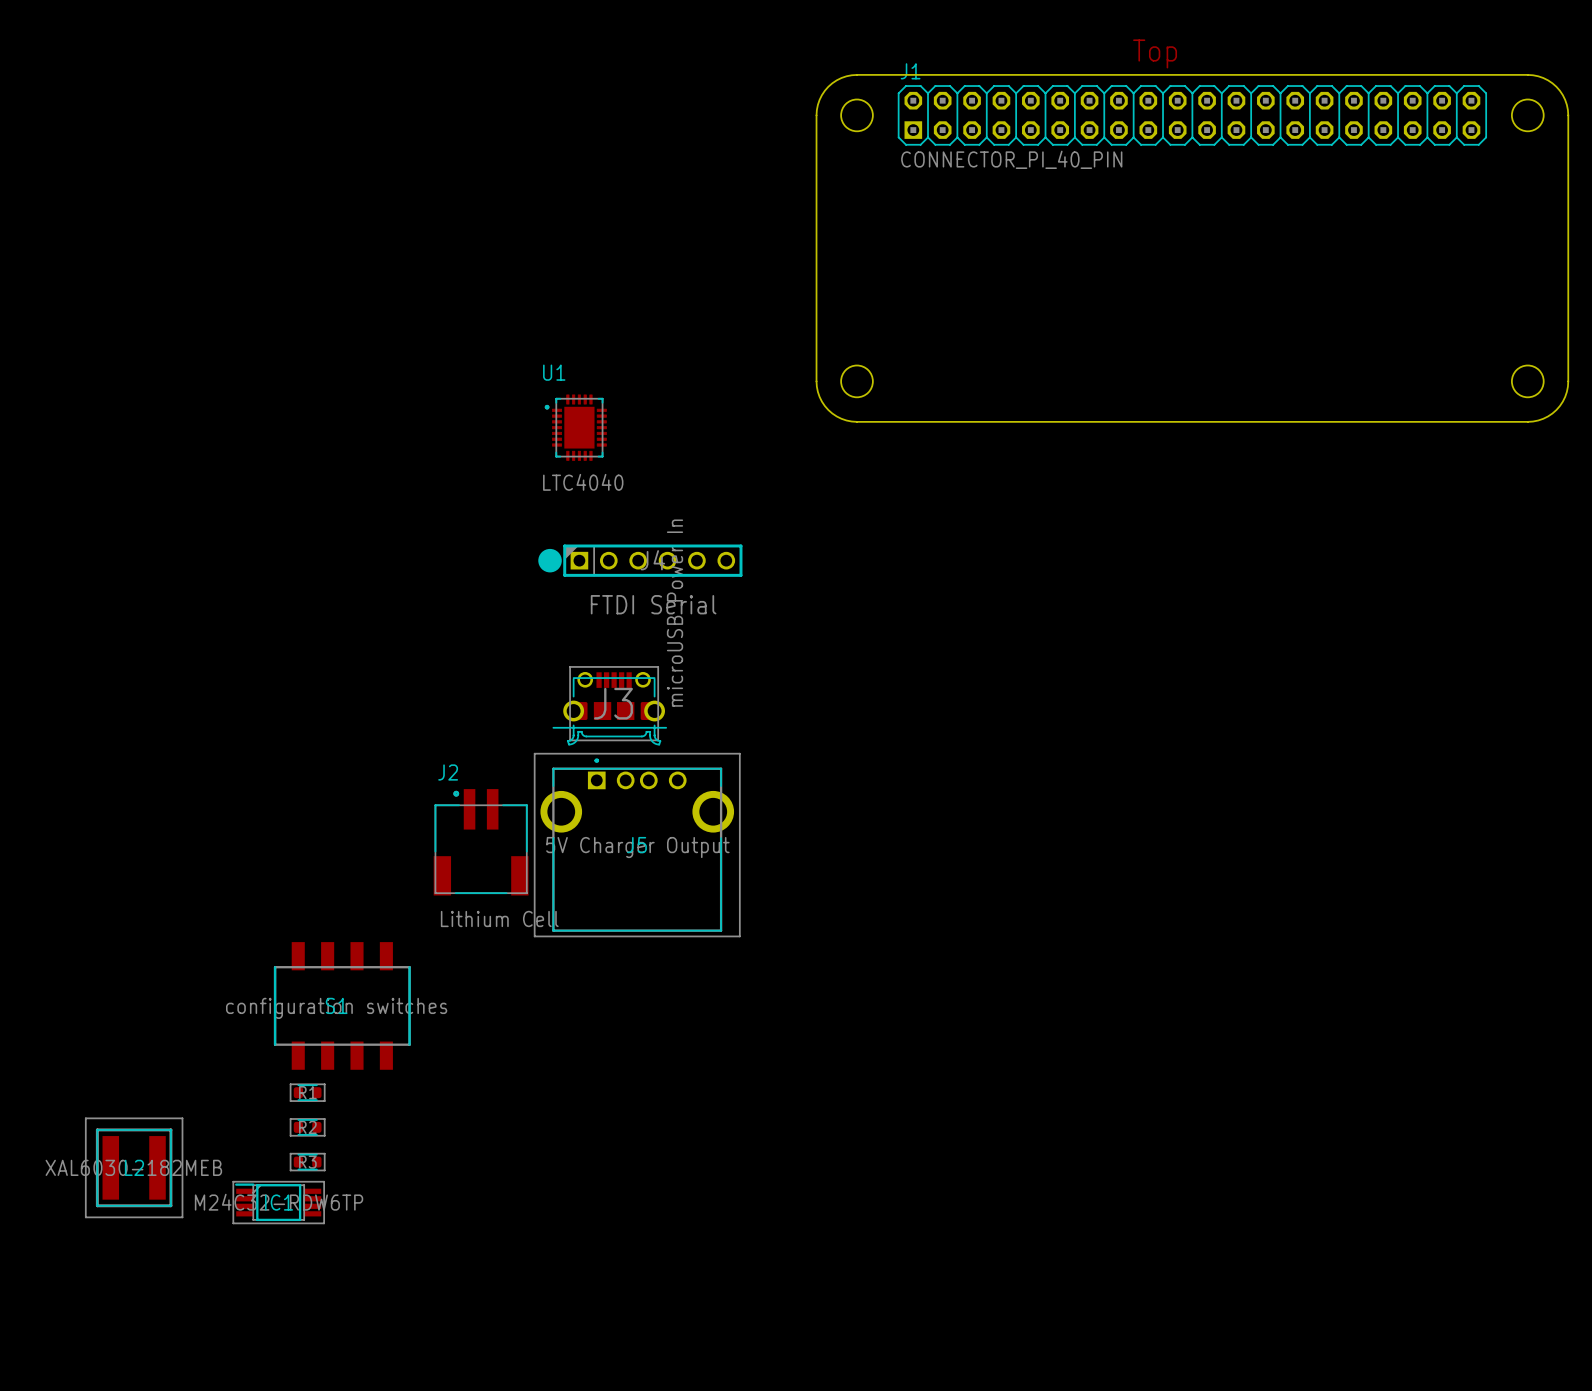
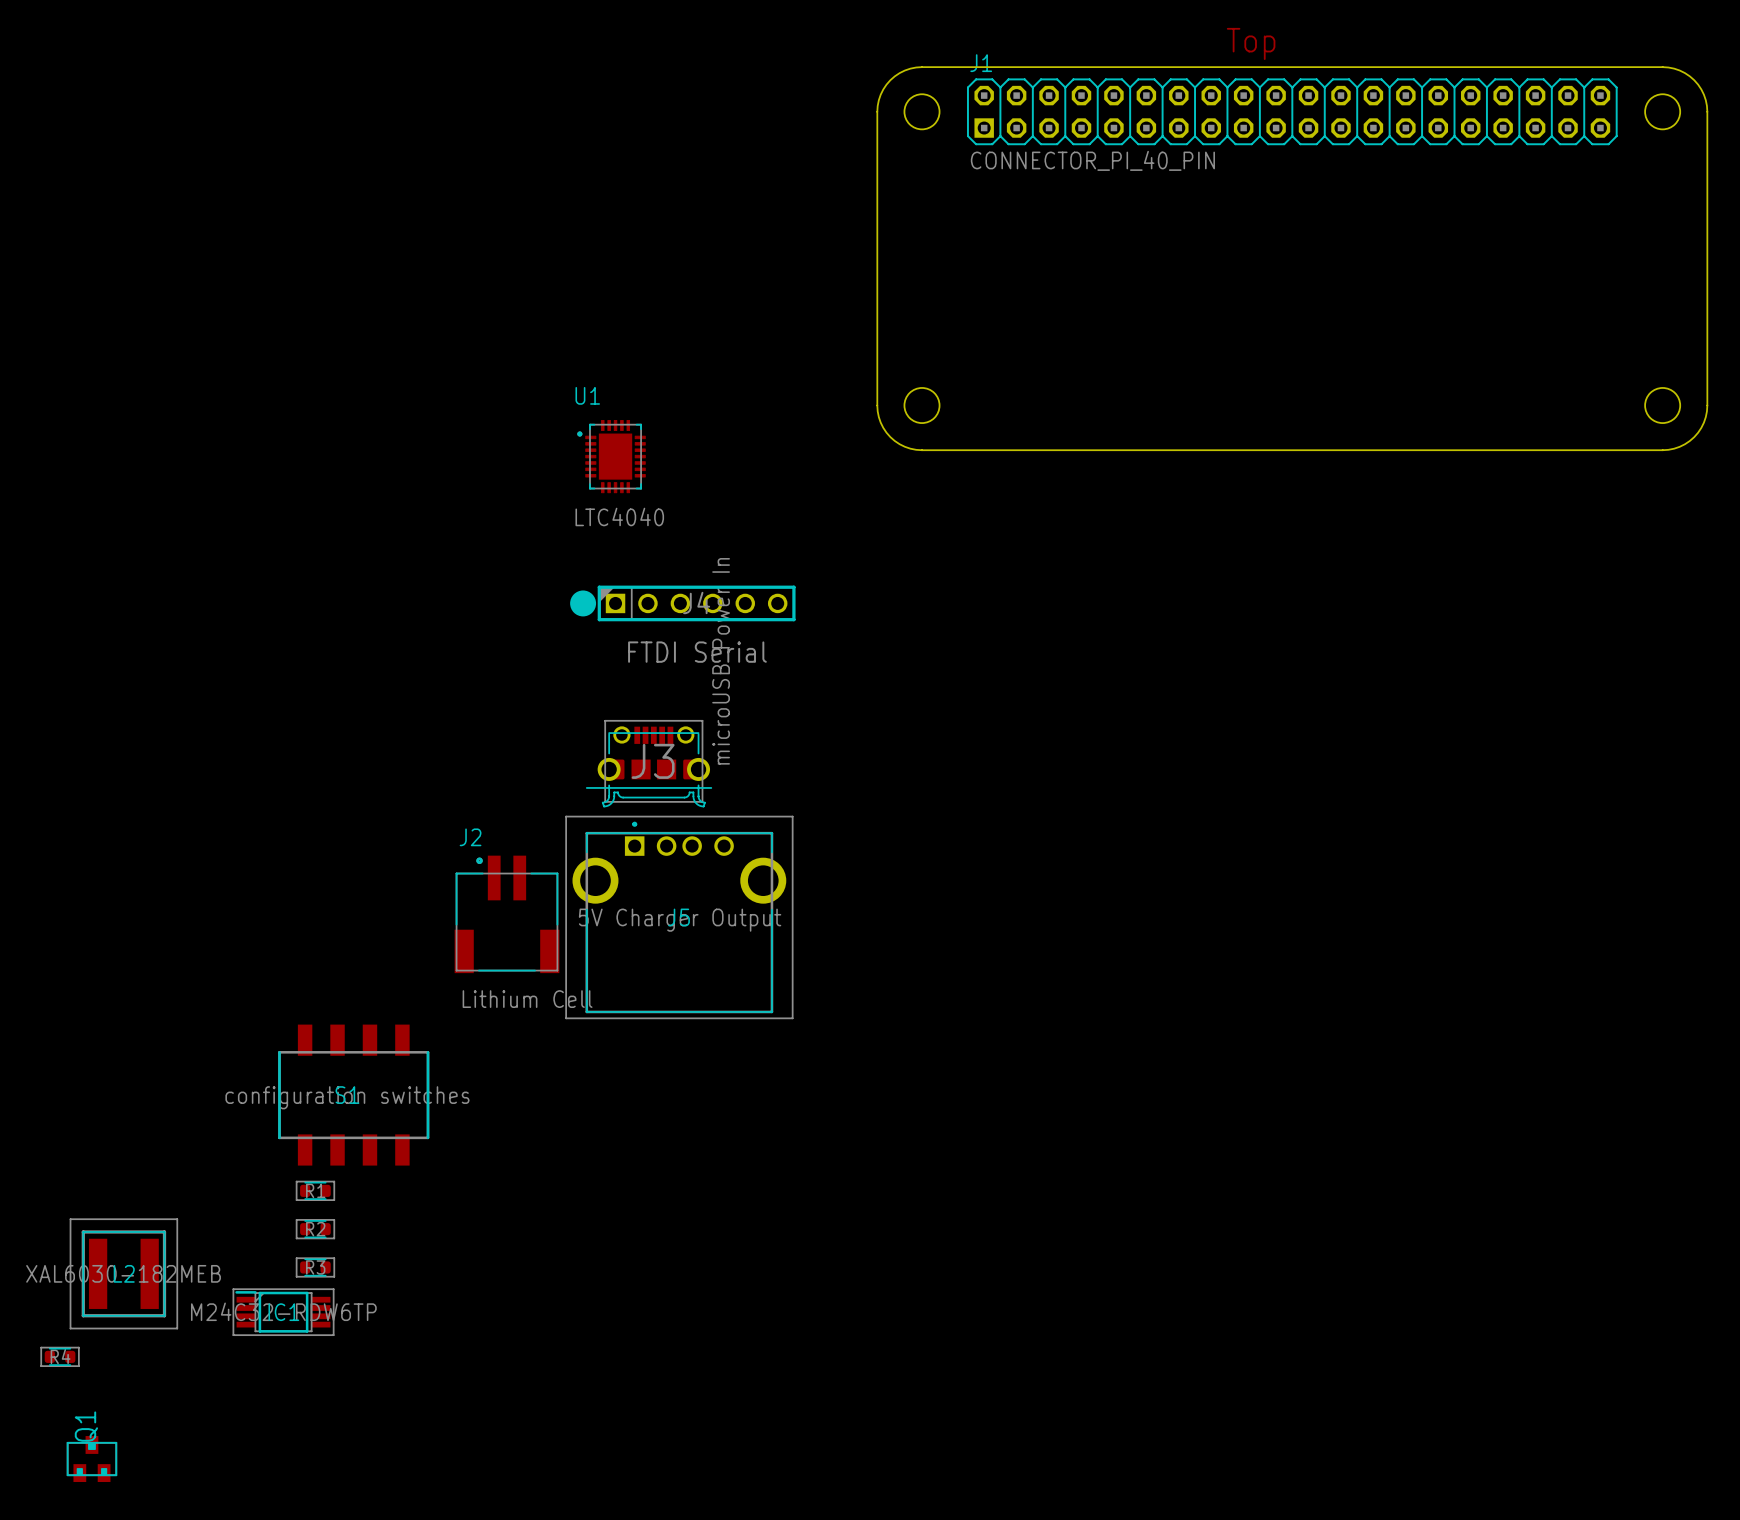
R4: none -> (60, 1356)
Q1: none -> (91, 1459)

